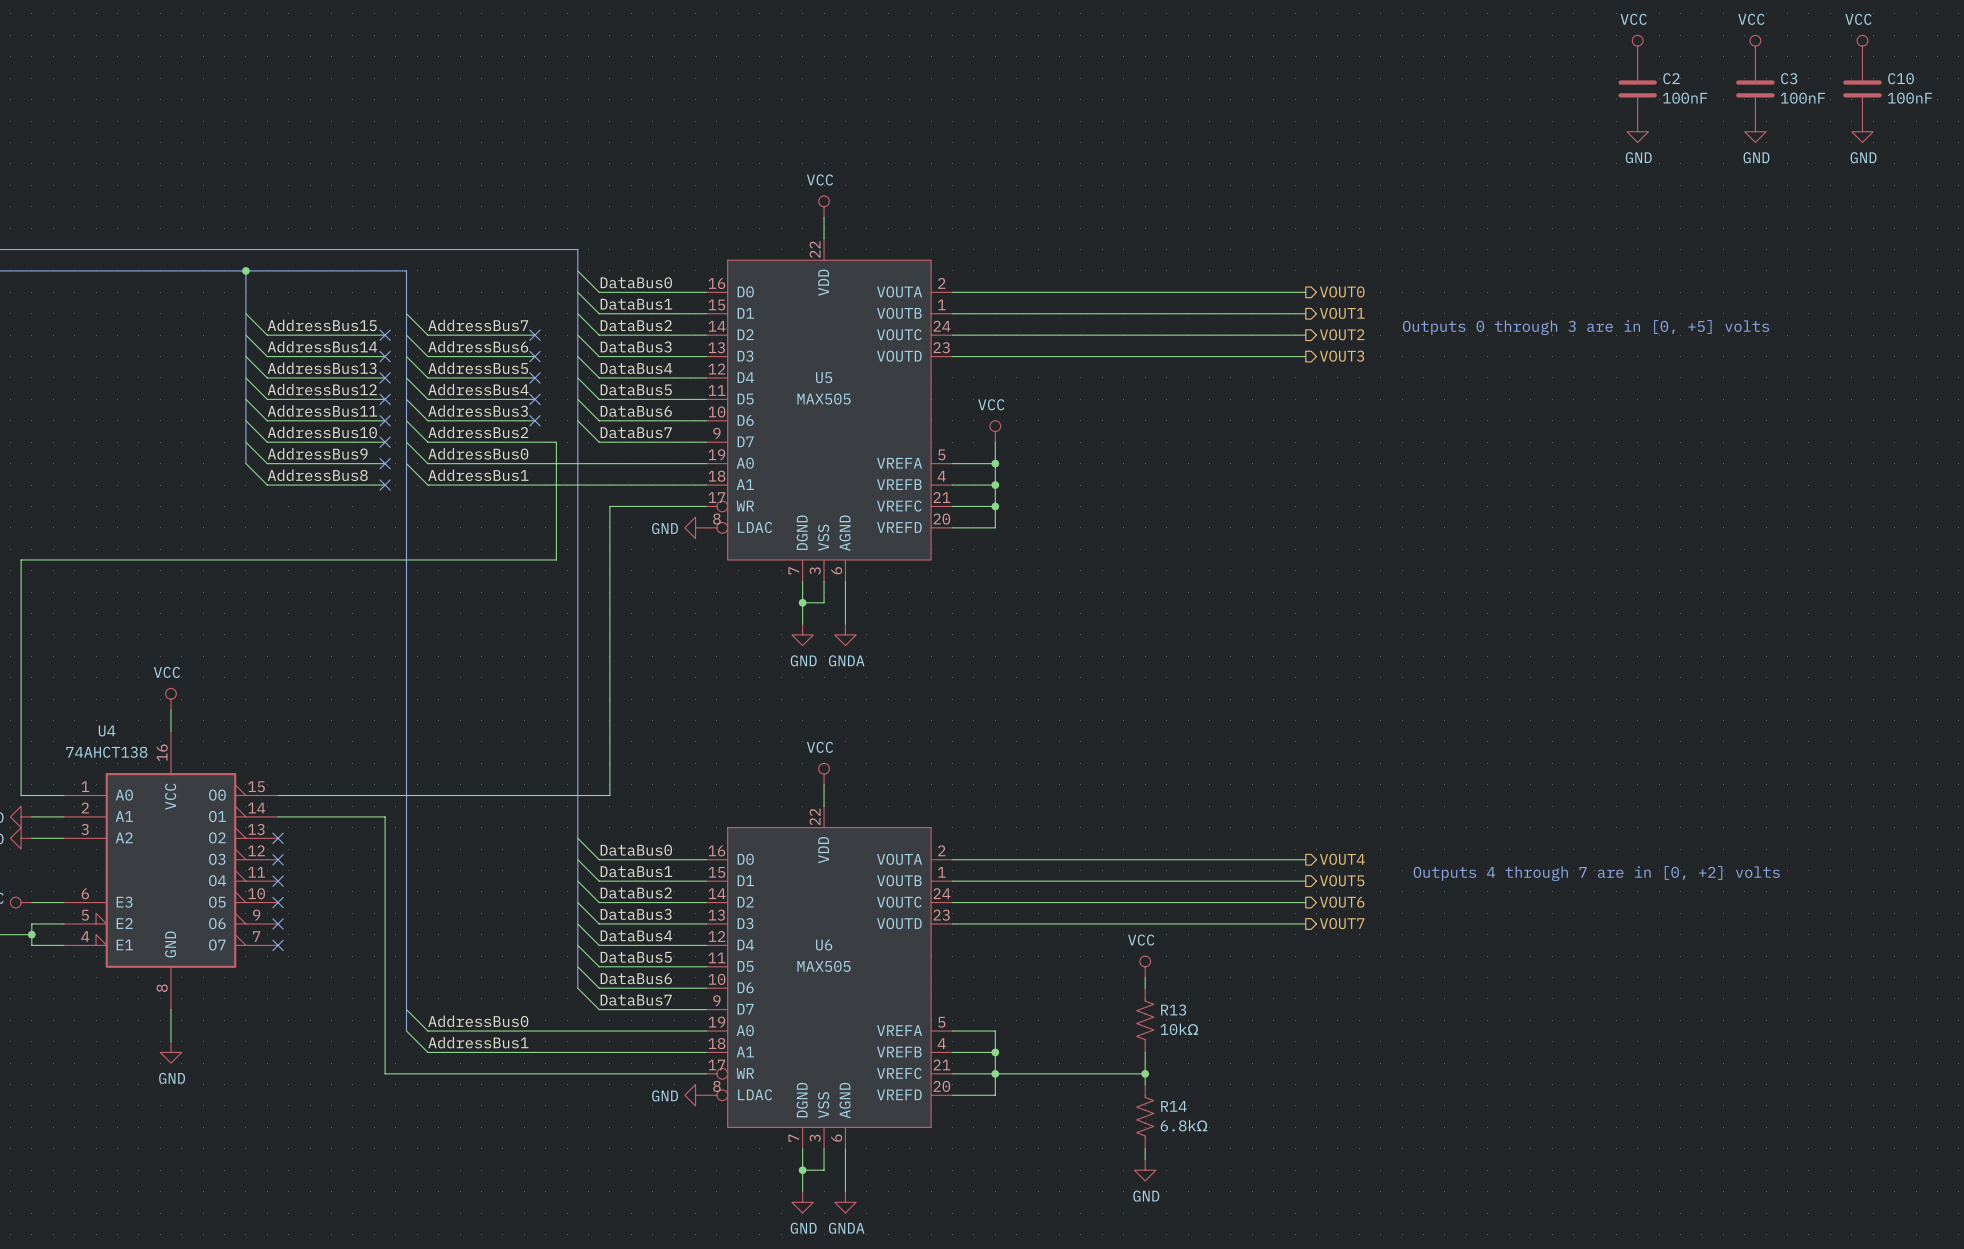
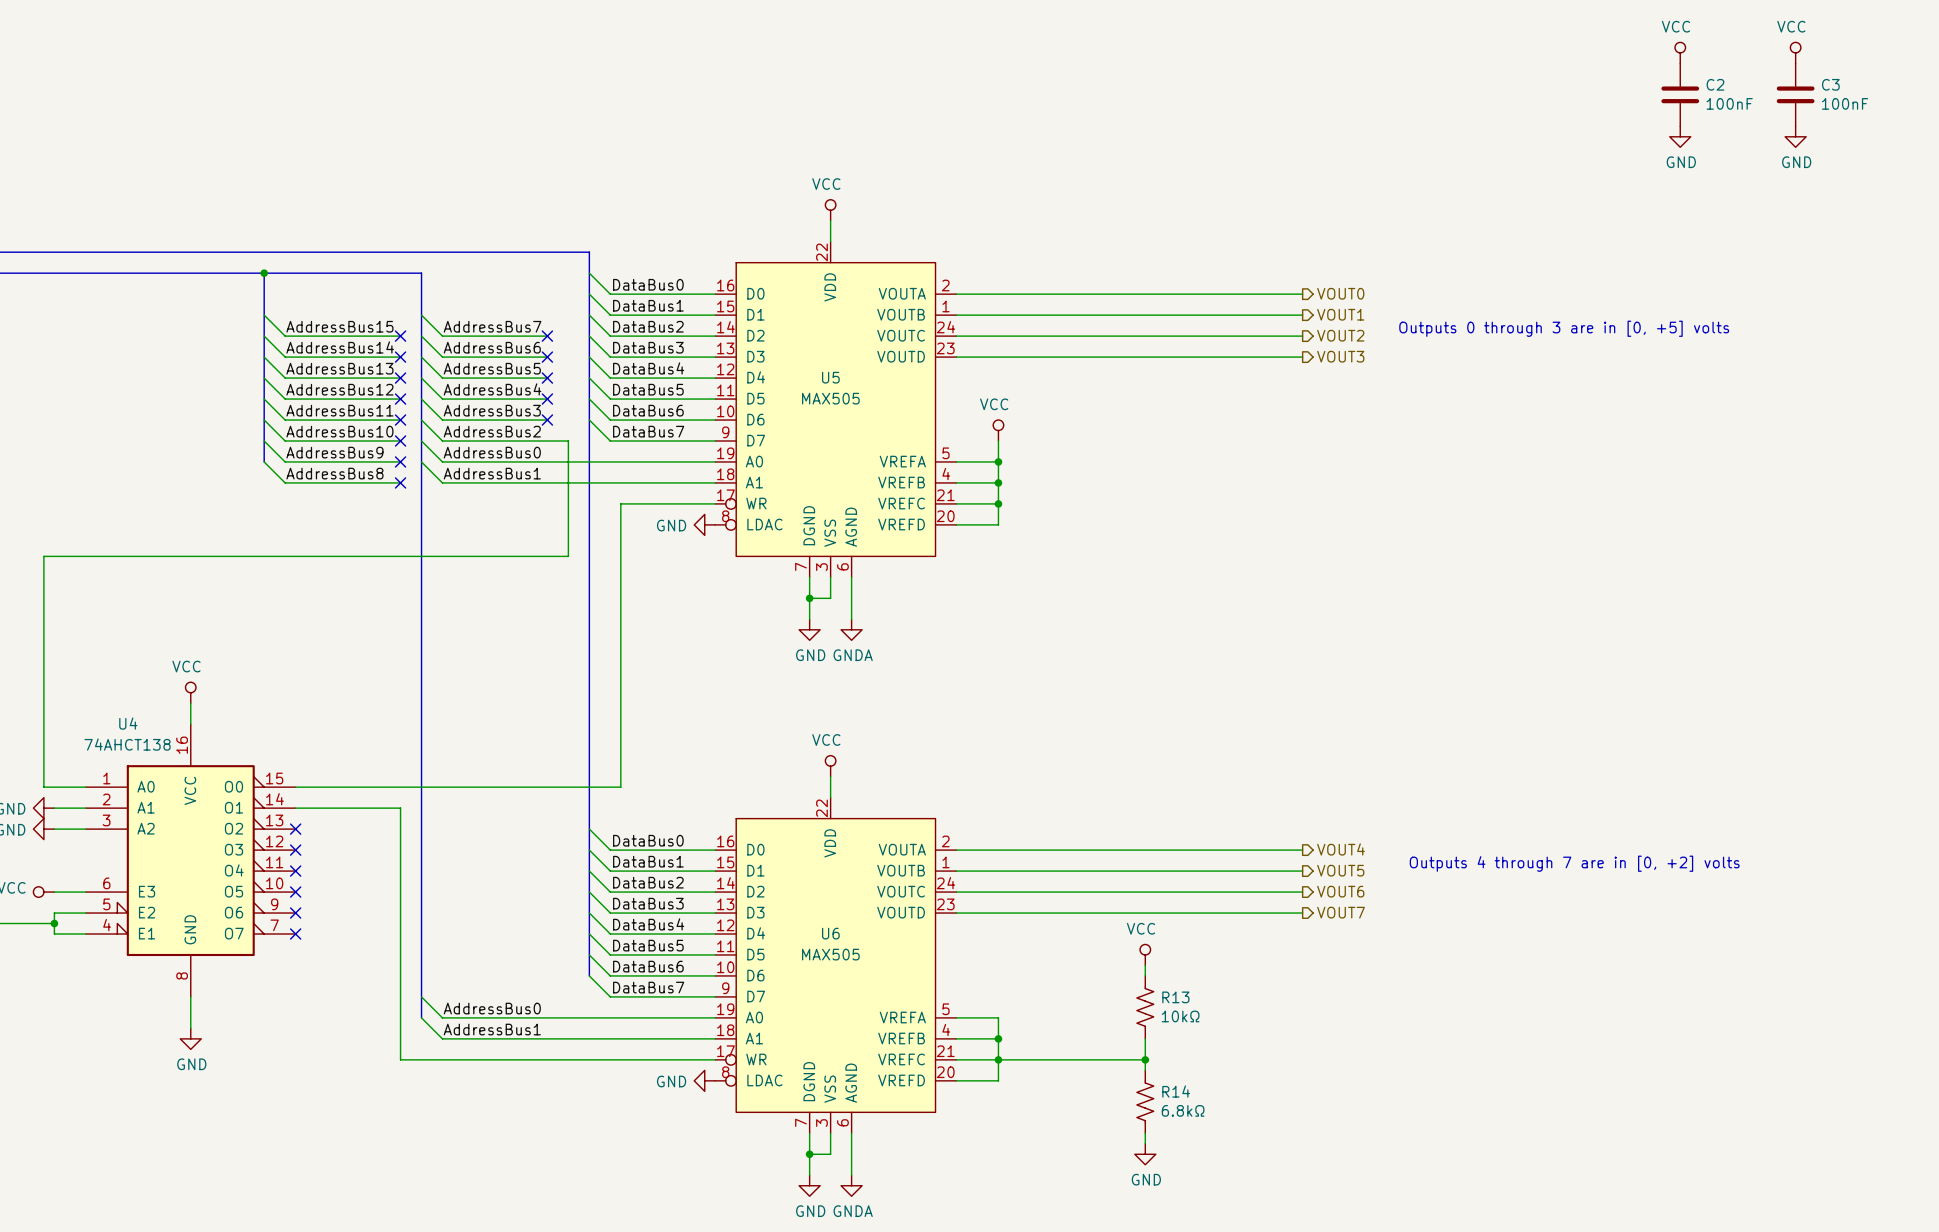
power symbol: VCC (1637, 46) -> none
power symbol: none -> VCC (1680, 52)
power symbol: VCC (1755, 46) -> none
power symbol: none -> VCC (1795, 52)
power symbol: VCC (1862, 46) -> none
C2 position: (1637, 88) -> (1680, 94)
C3 position: (1755, 88) -> (1795, 94)
C10: 100nF (1862, 88) -> none
power symbol: GND (1637, 131) -> none
power symbol: none -> GND (1680, 136)
power symbol: GND (1755, 131) -> none
power symbol: none -> GND (1795, 136)
power symbol: GND (1862, 131) -> none

